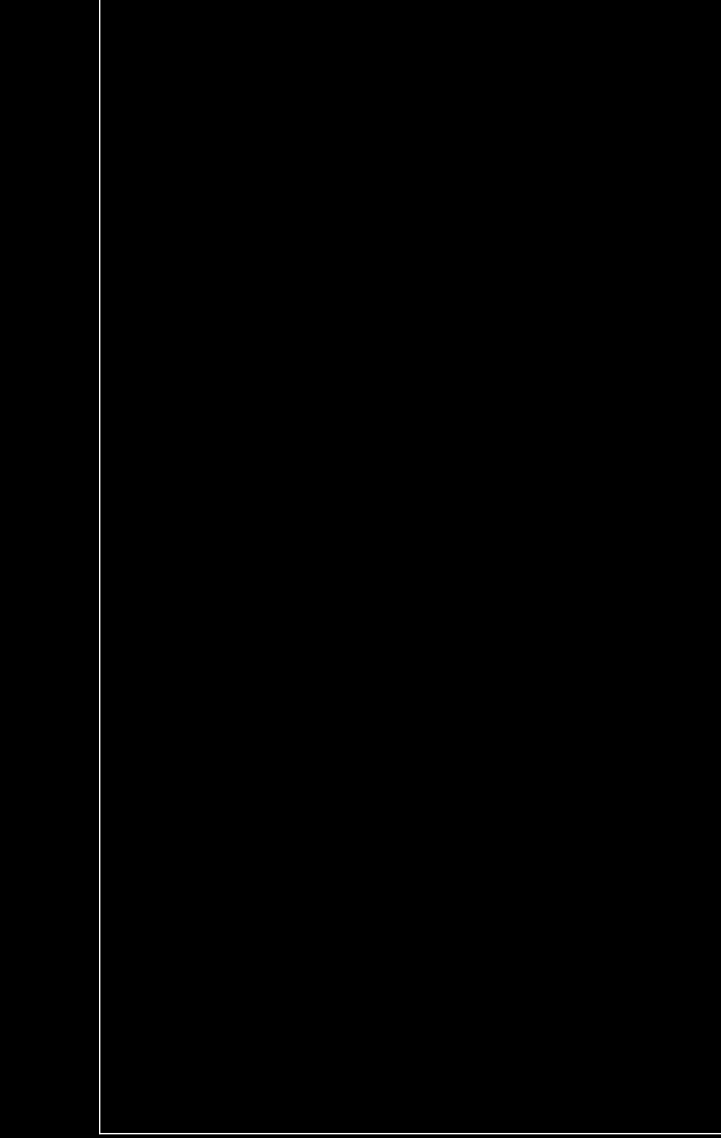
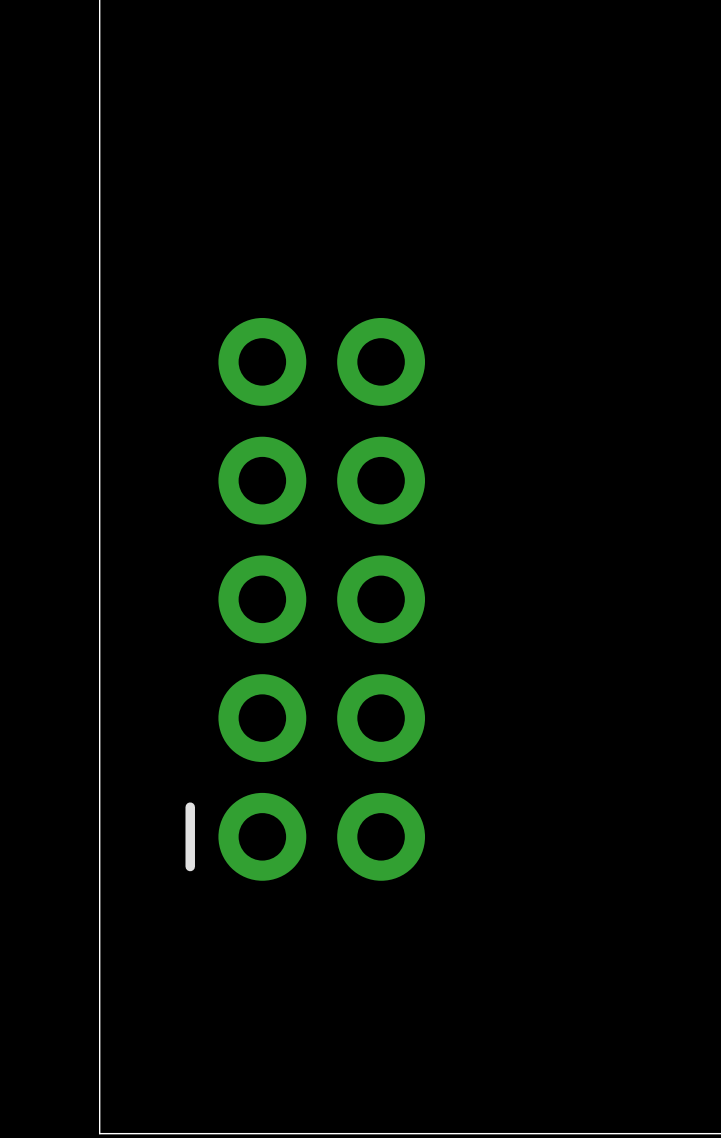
part: none -> (305, 599)

